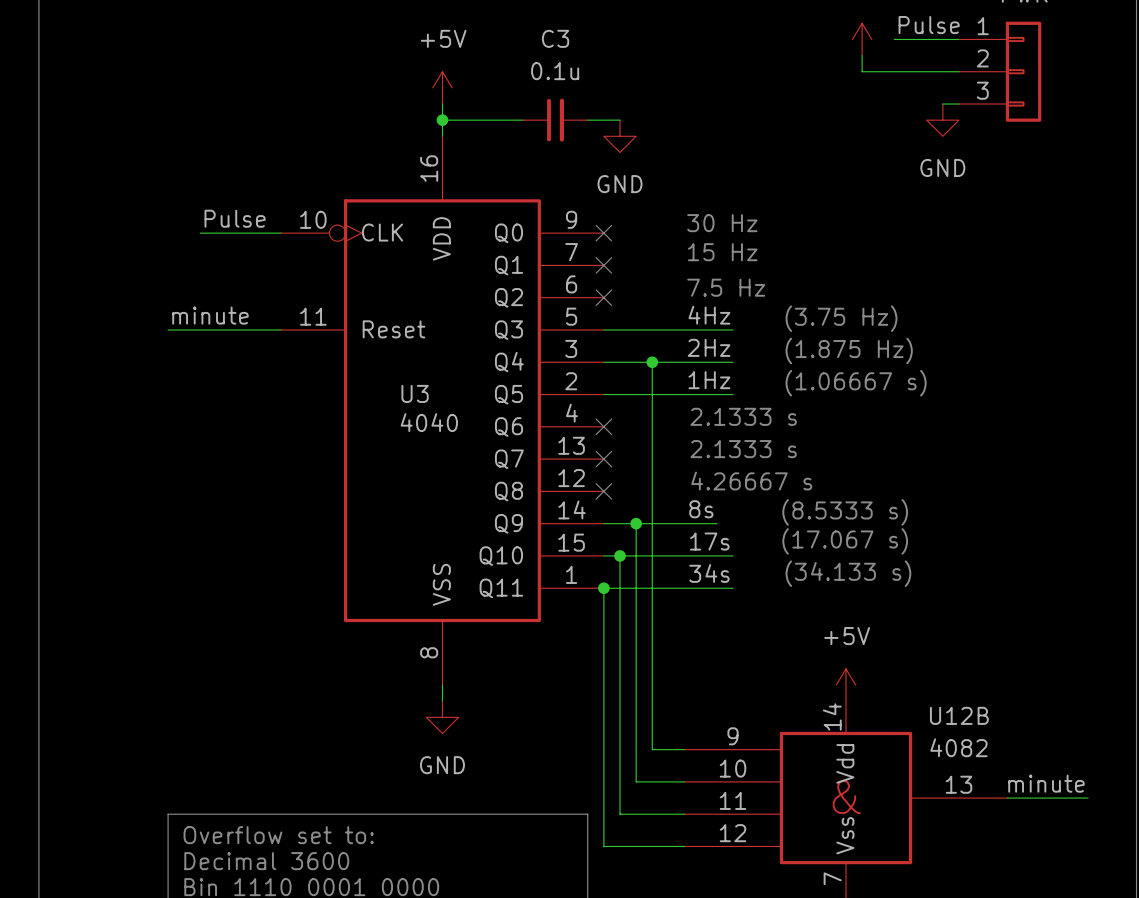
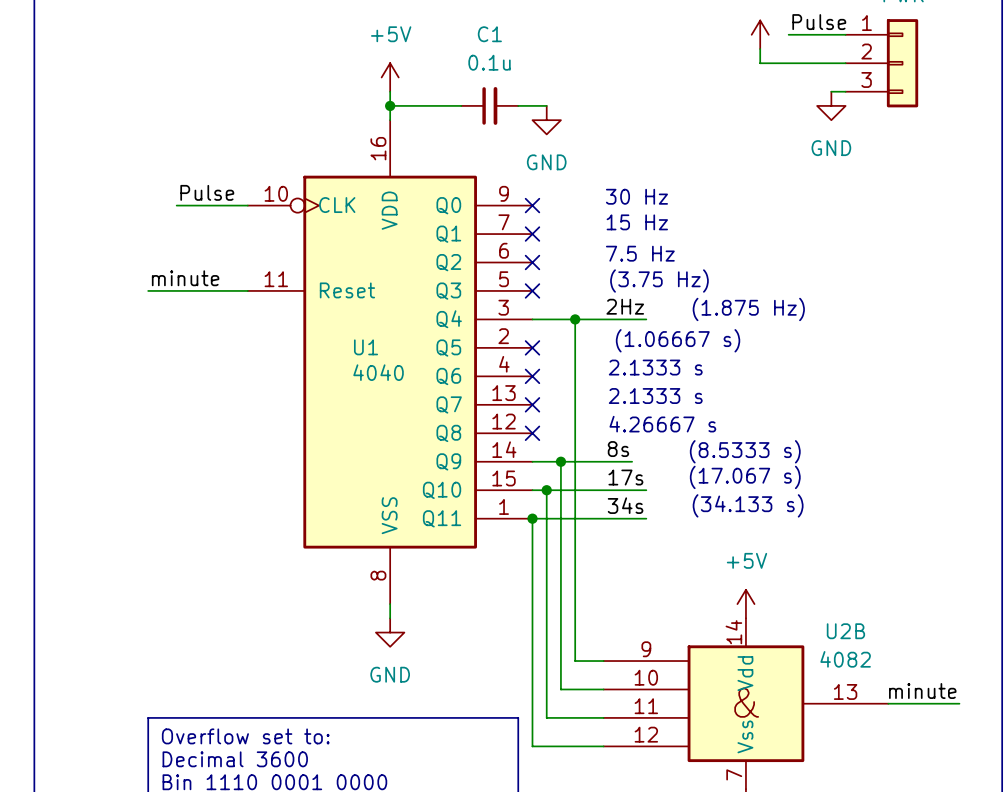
C3 name: C3 (555, 38) -> C1 (489, 34)
label: 4Hz (709, 315) -> none
text position: (3.75 Hz) (841, 318) -> (3.75 Hz) (659, 281)
wire: (603, 329) (733, 329) -> none
no-connect mark: none -> (532, 290)
label: 1Hz (709, 380) -> none
text position: (1.06667 s) (856, 383) -> (1.06667 s) (678, 340)
U3 name: U3 (415, 393) -> U1 (366, 347)
wire: (603, 394) (733, 394) -> none
no-connect mark: none -> (532, 347)
U12B name: U12B (959, 715) -> U2B (845, 631)

